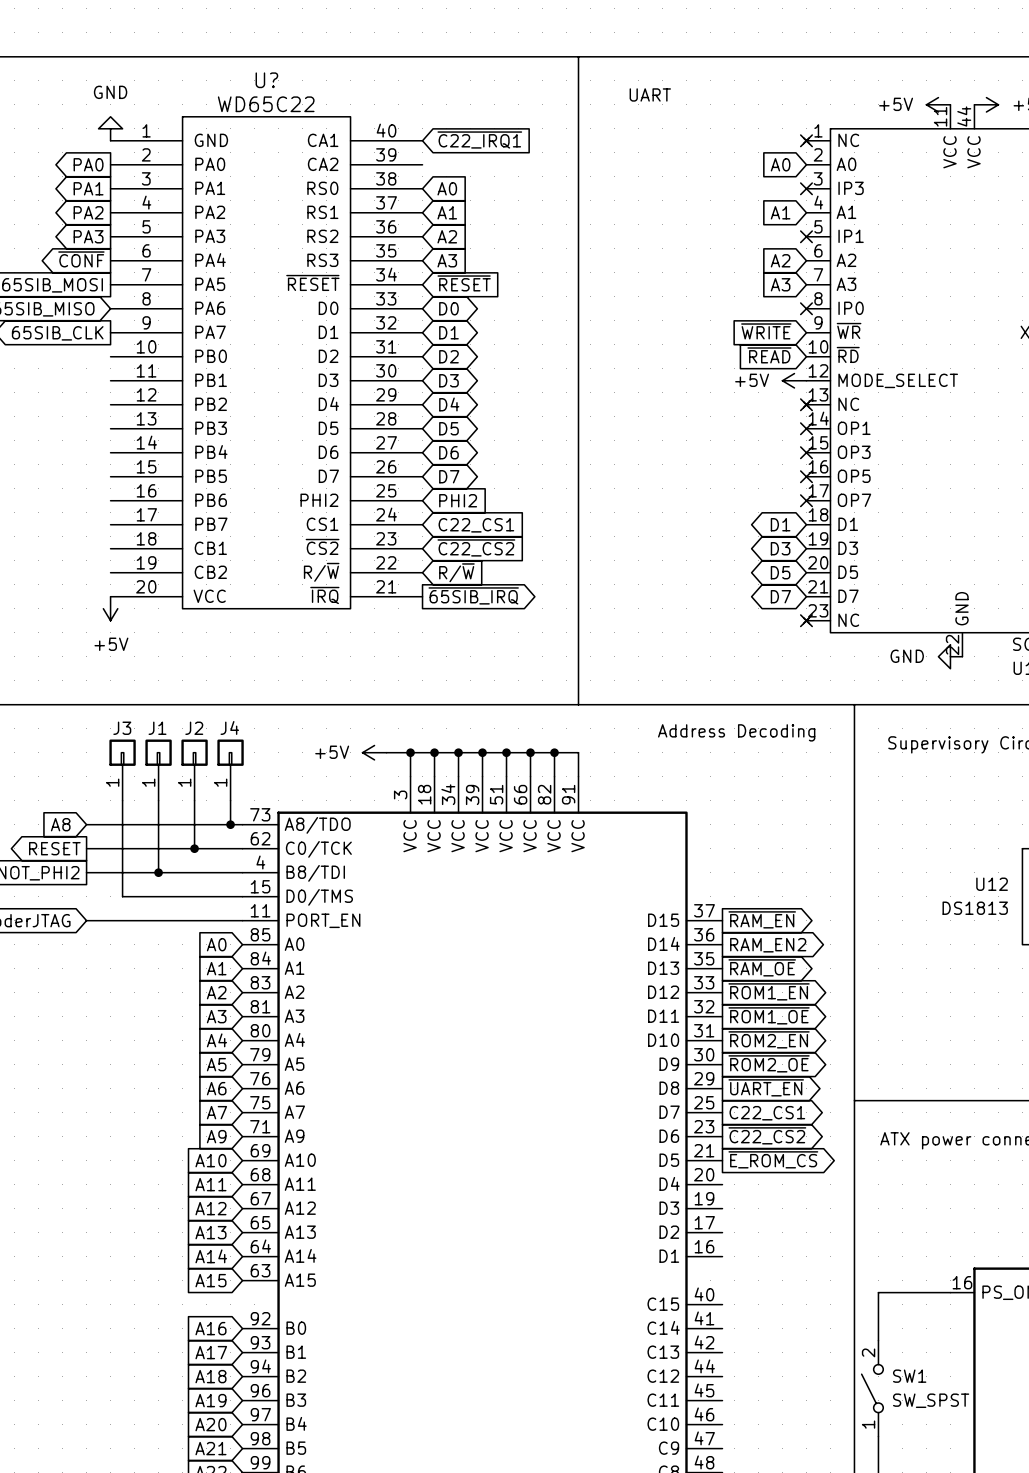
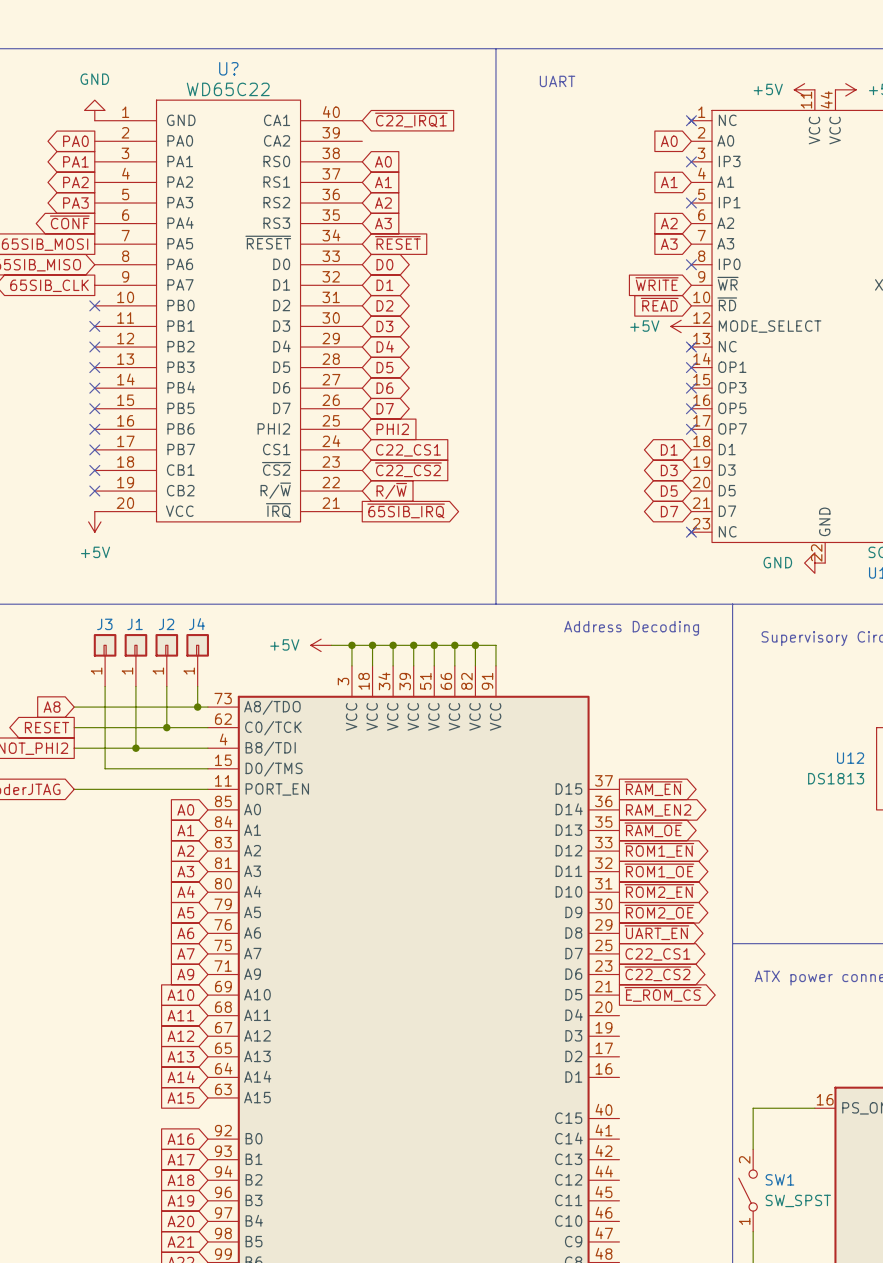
no-connect mark: none -> (94, 305)
no-connect mark: none -> (94, 326)
no-connect mark: none -> (94, 347)
no-connect mark: none -> (94, 367)
no-connect mark: none -> (94, 388)
no-connect mark: none -> (94, 408)
no-connect mark: none -> (94, 429)
no-connect mark: none -> (94, 449)
no-connect mark: none -> (94, 470)
no-connect mark: none -> (94, 491)

